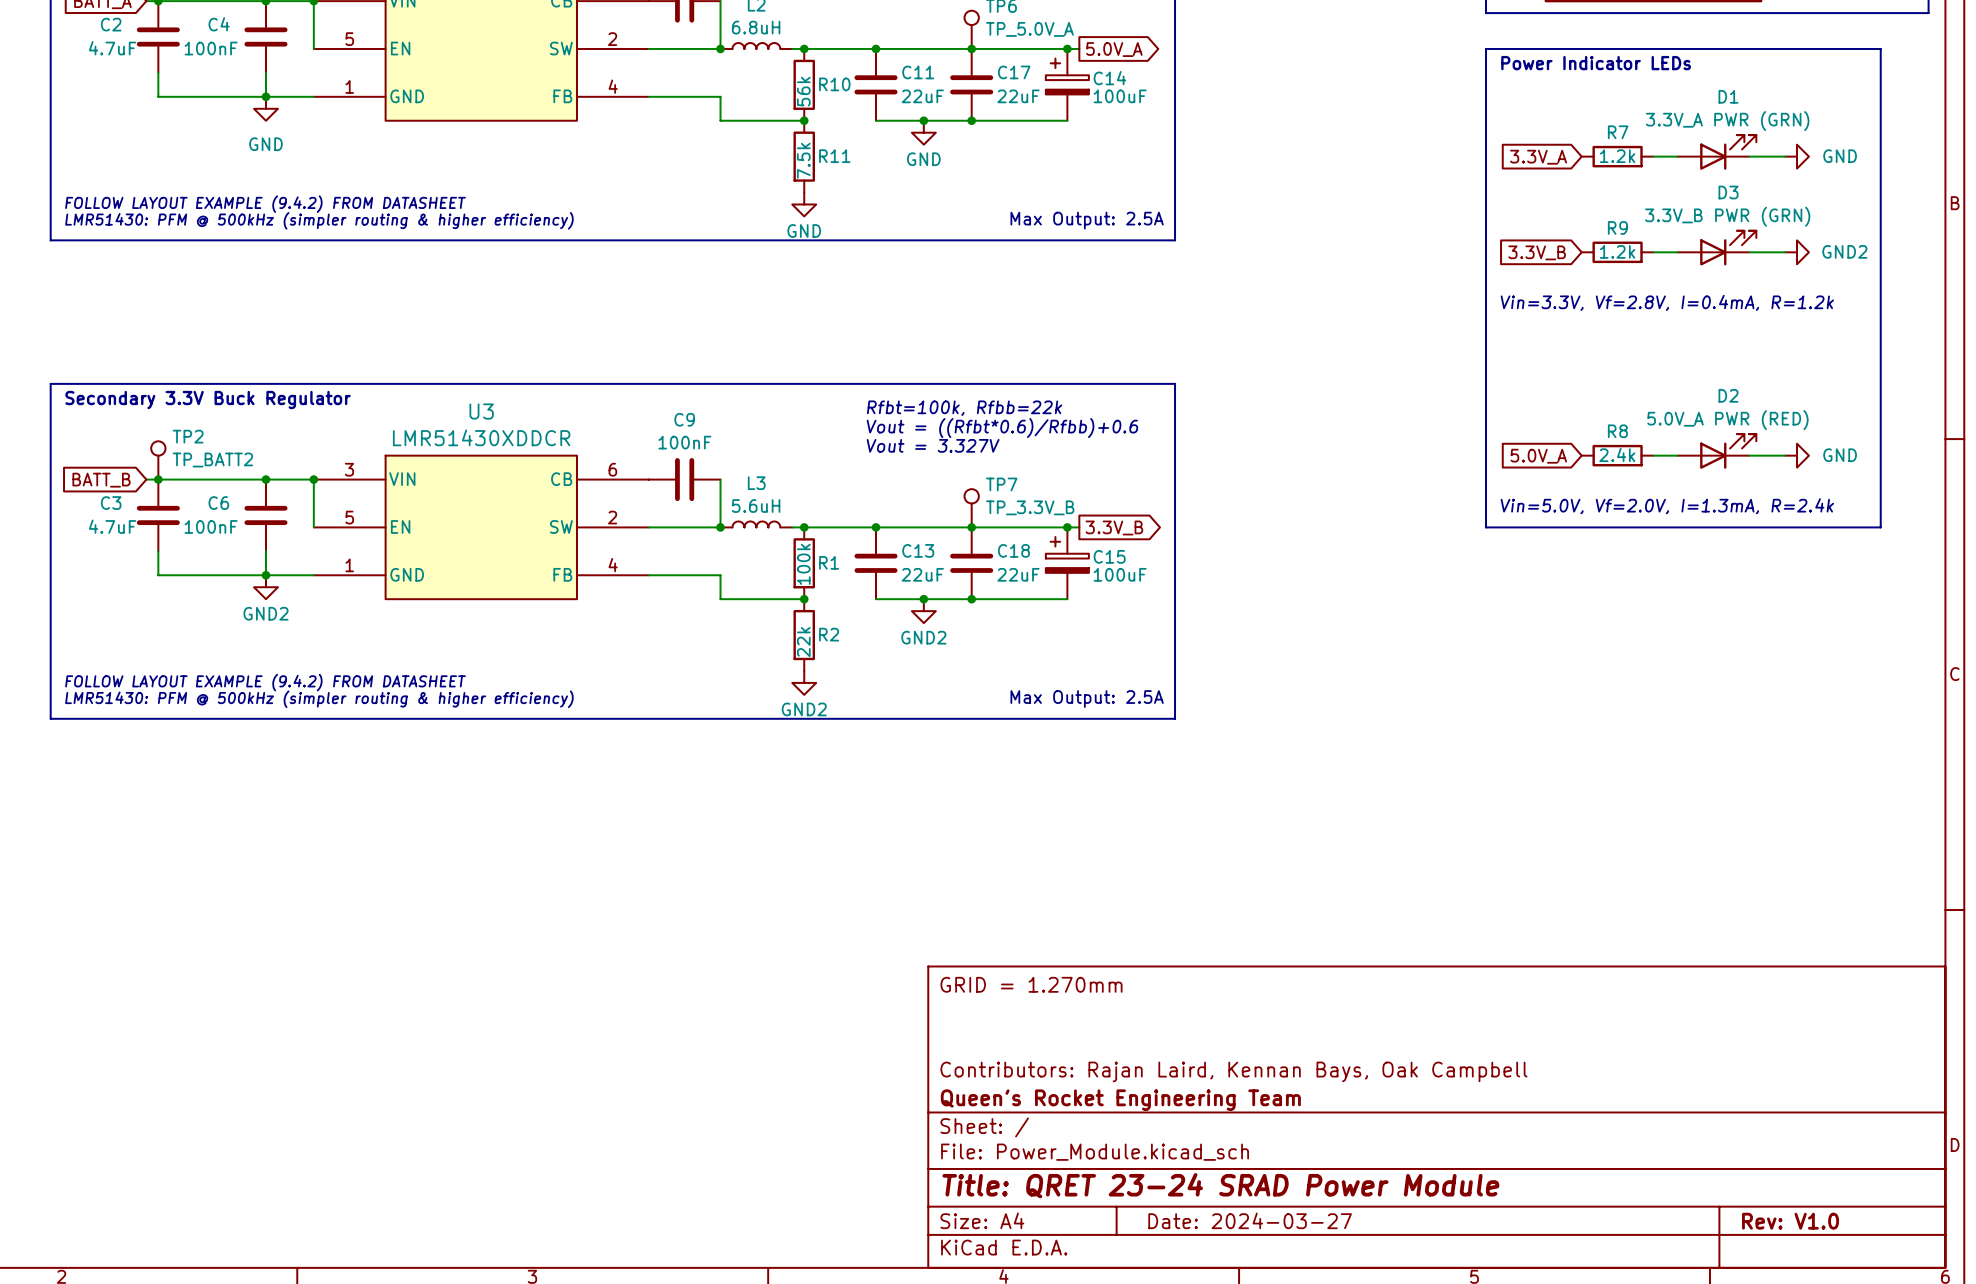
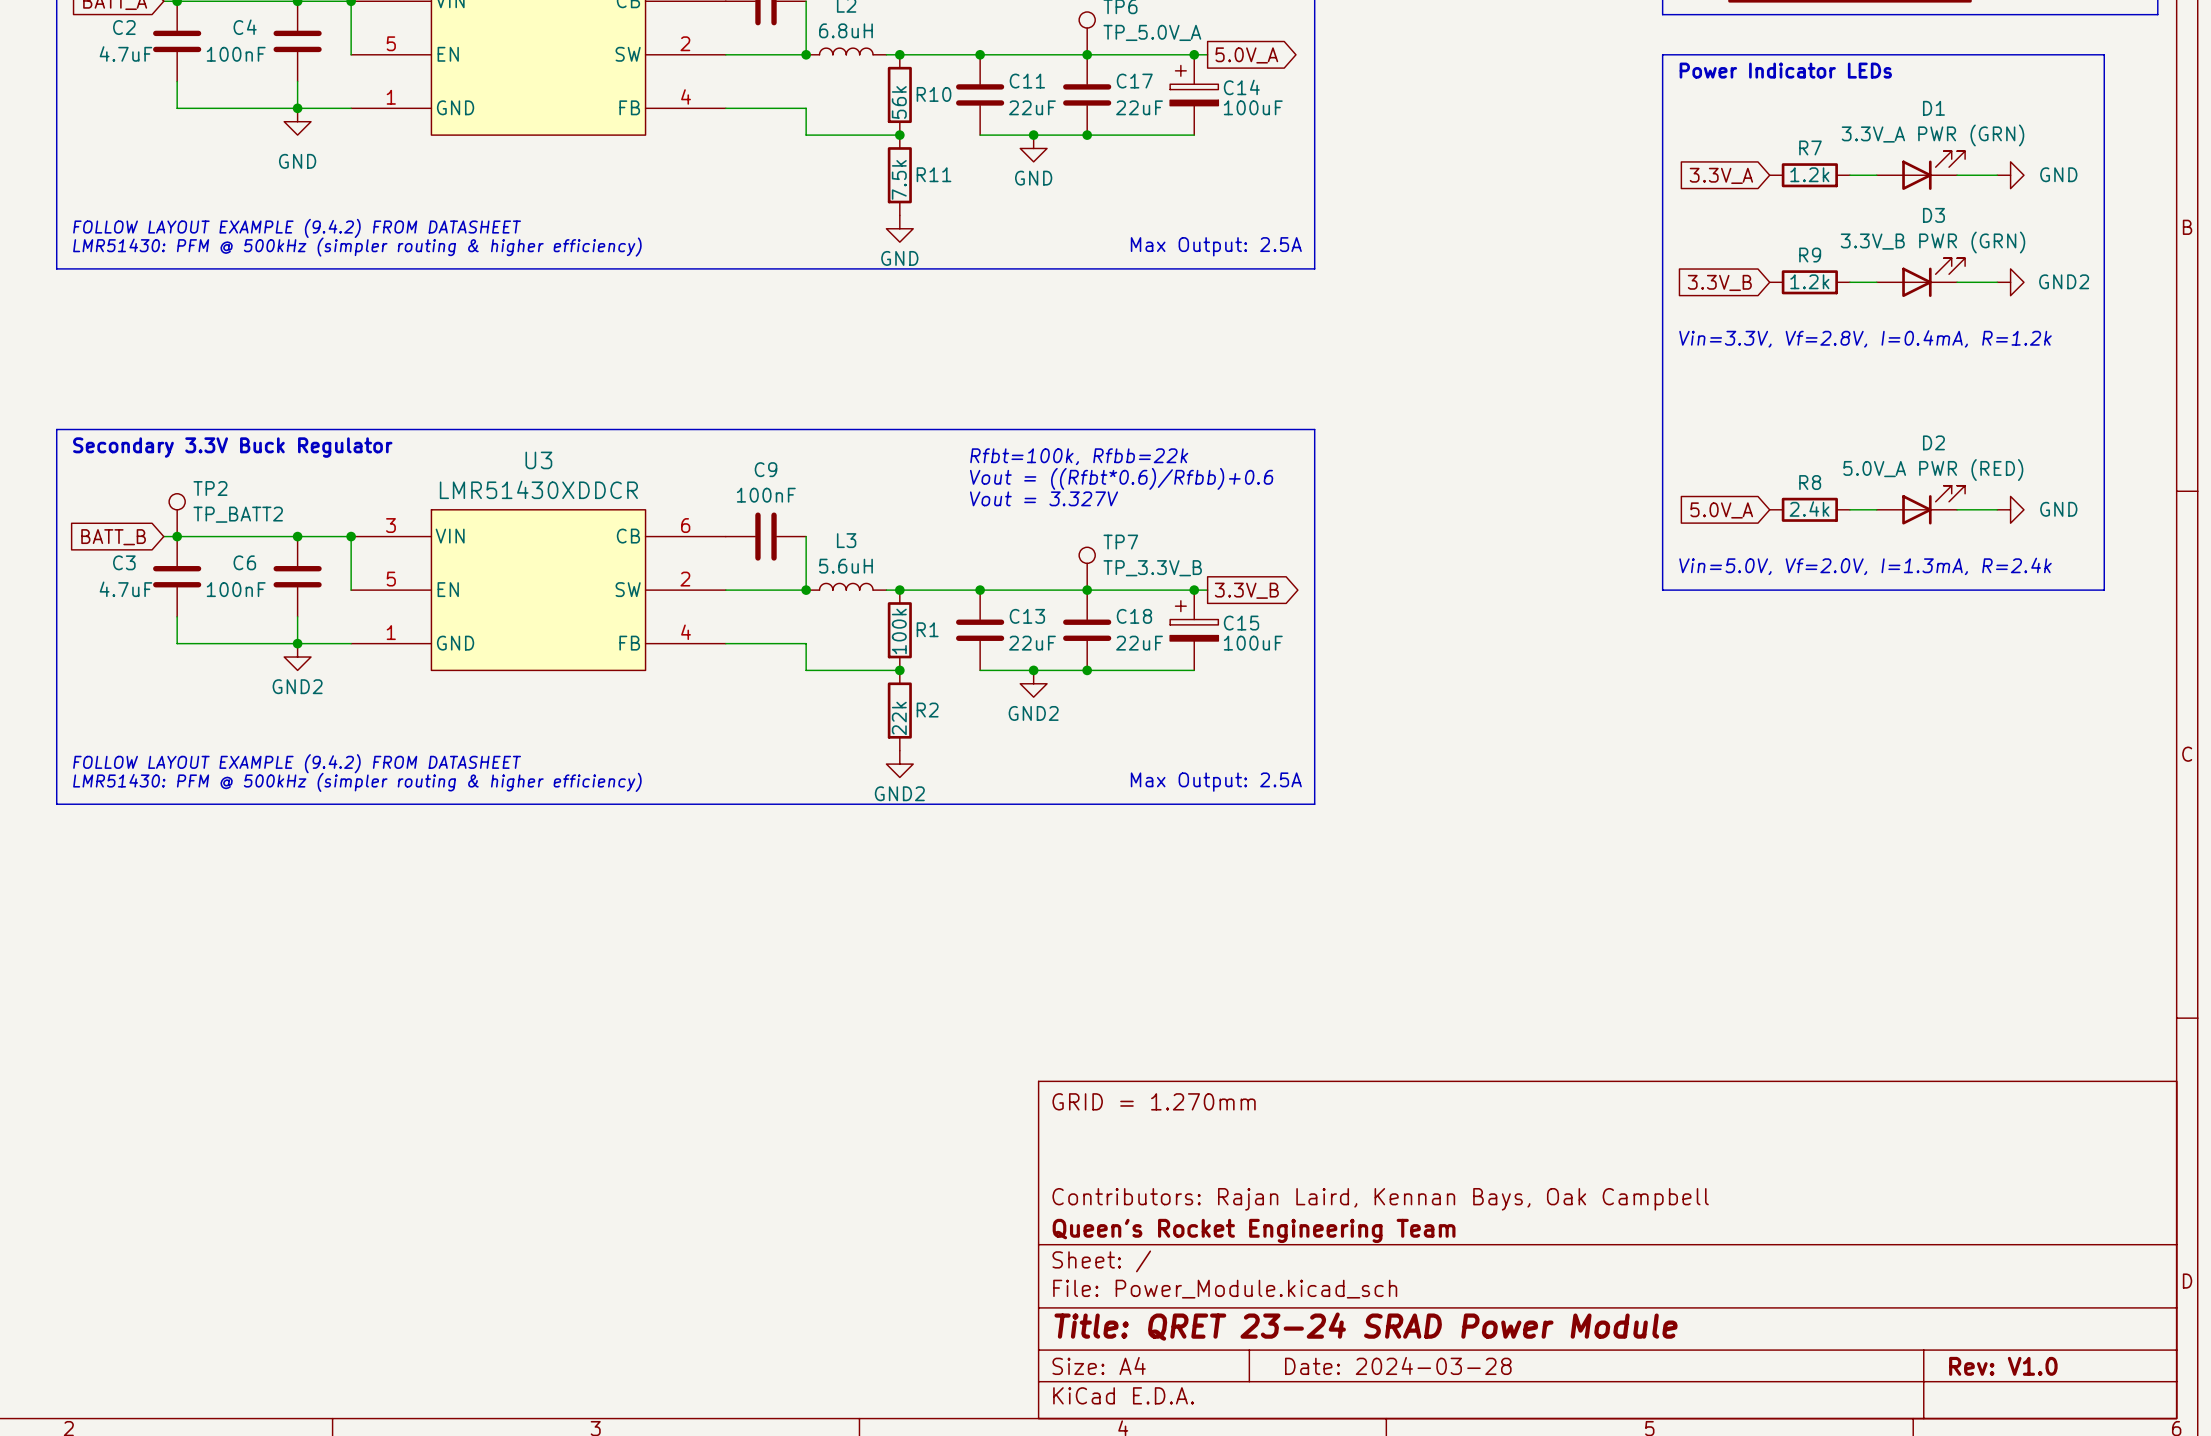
title block: Date: 2024-03-27 (1250, 1220) -> Date: 2024-03-28 (1398, 1365)

